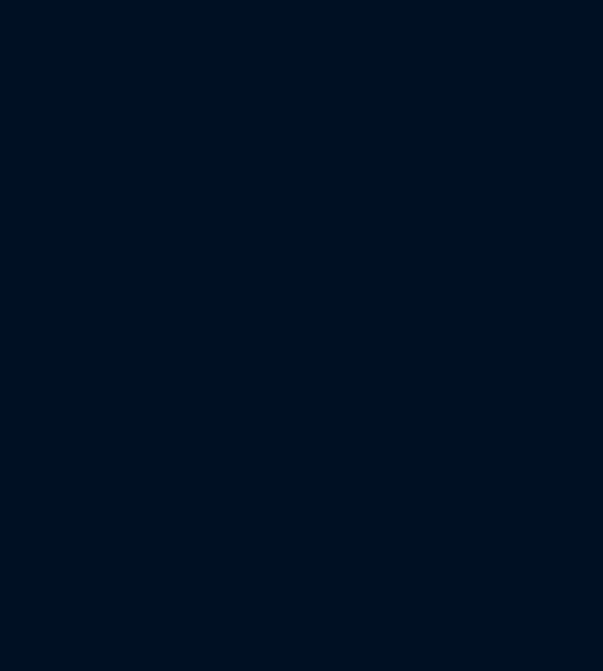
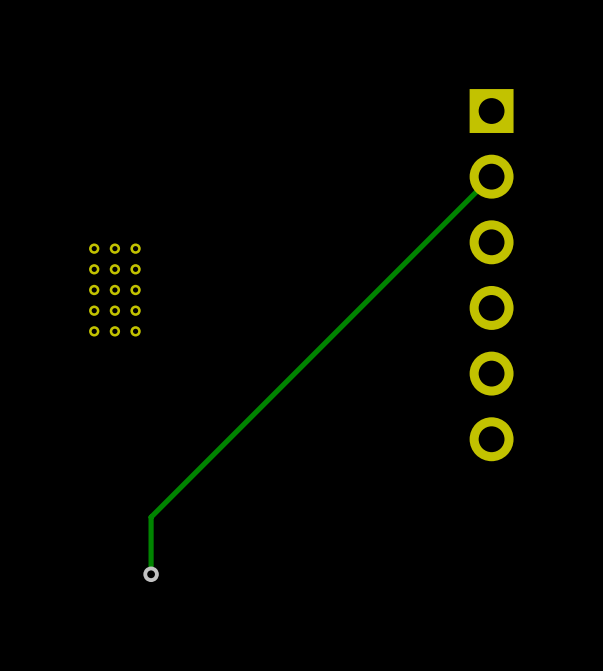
track: none -> (491, 176) (151, 517) (151, 574)
part: none -> (491, 275)
part: none -> (114, 289)
via: none -> (151, 574)

